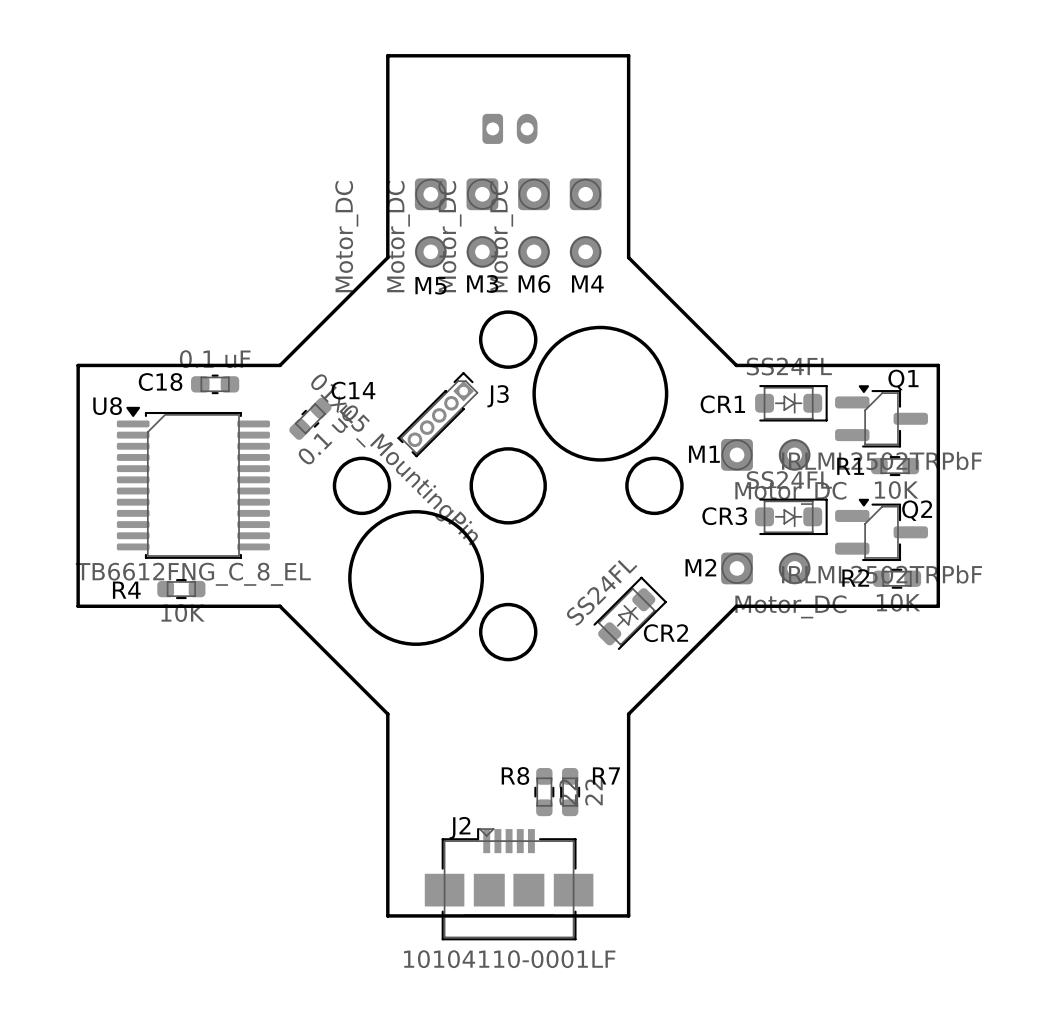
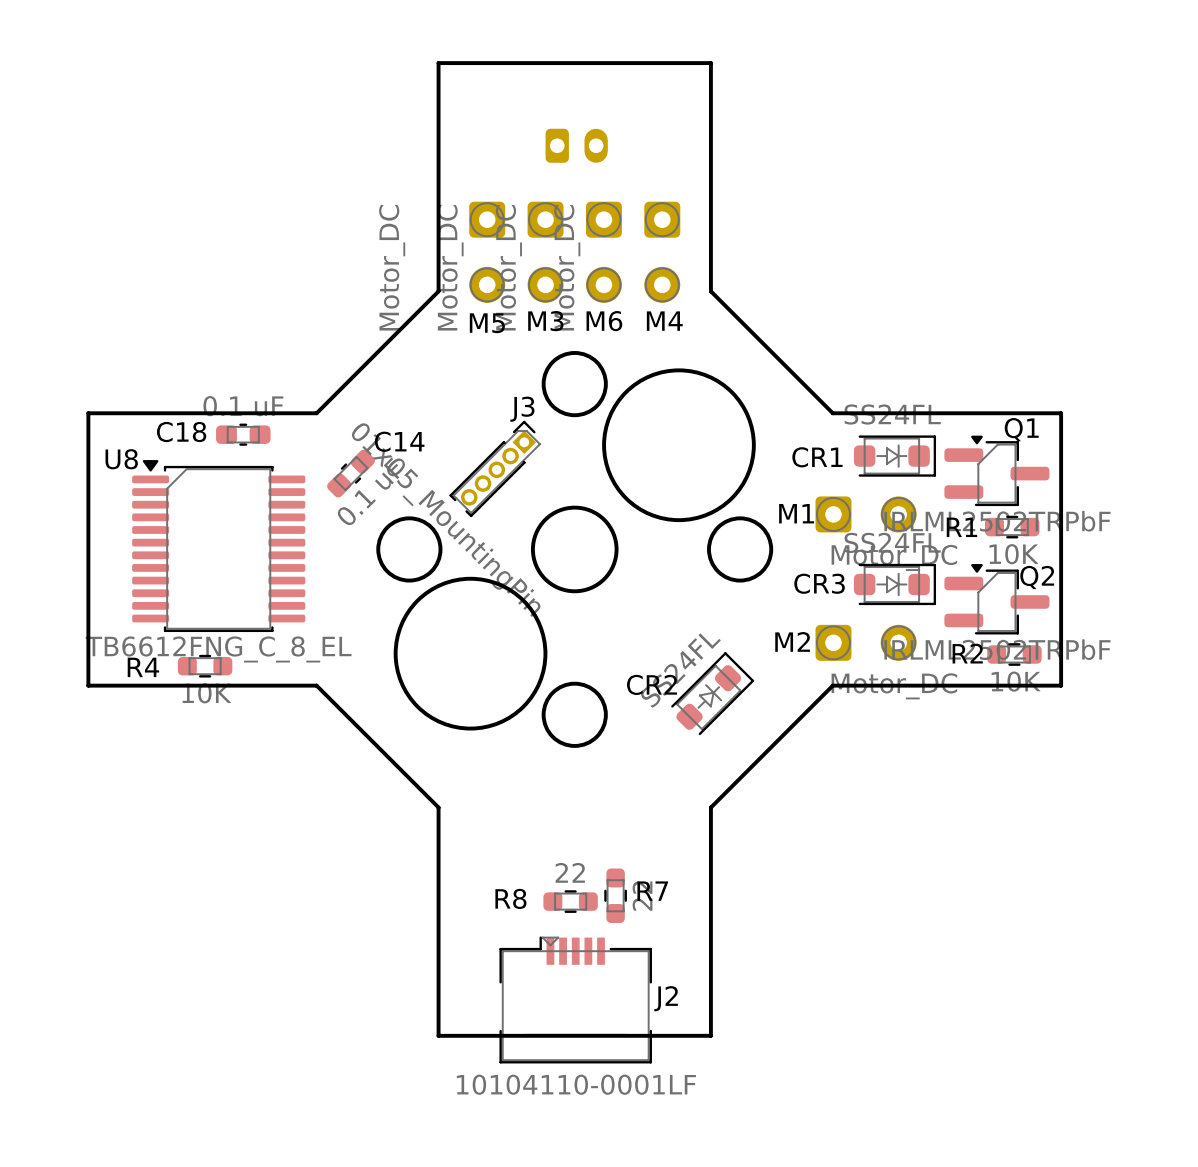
J3 name position: J3 (498, 396) -> J3 (522, 409)
CR2 name position: CR2 (665, 633) -> CR2 (651, 684)
R8 name: R8 (515, 775) -> R7 (652, 891)
R7: 22 (570, 792) -> none
R8: none -> 22 (570, 901)
J2 footprint: [424, 828, 594, 941] -> [499, 936, 652, 1064]
J2 name position: J2 (459, 828) -> J2 (666, 998)

